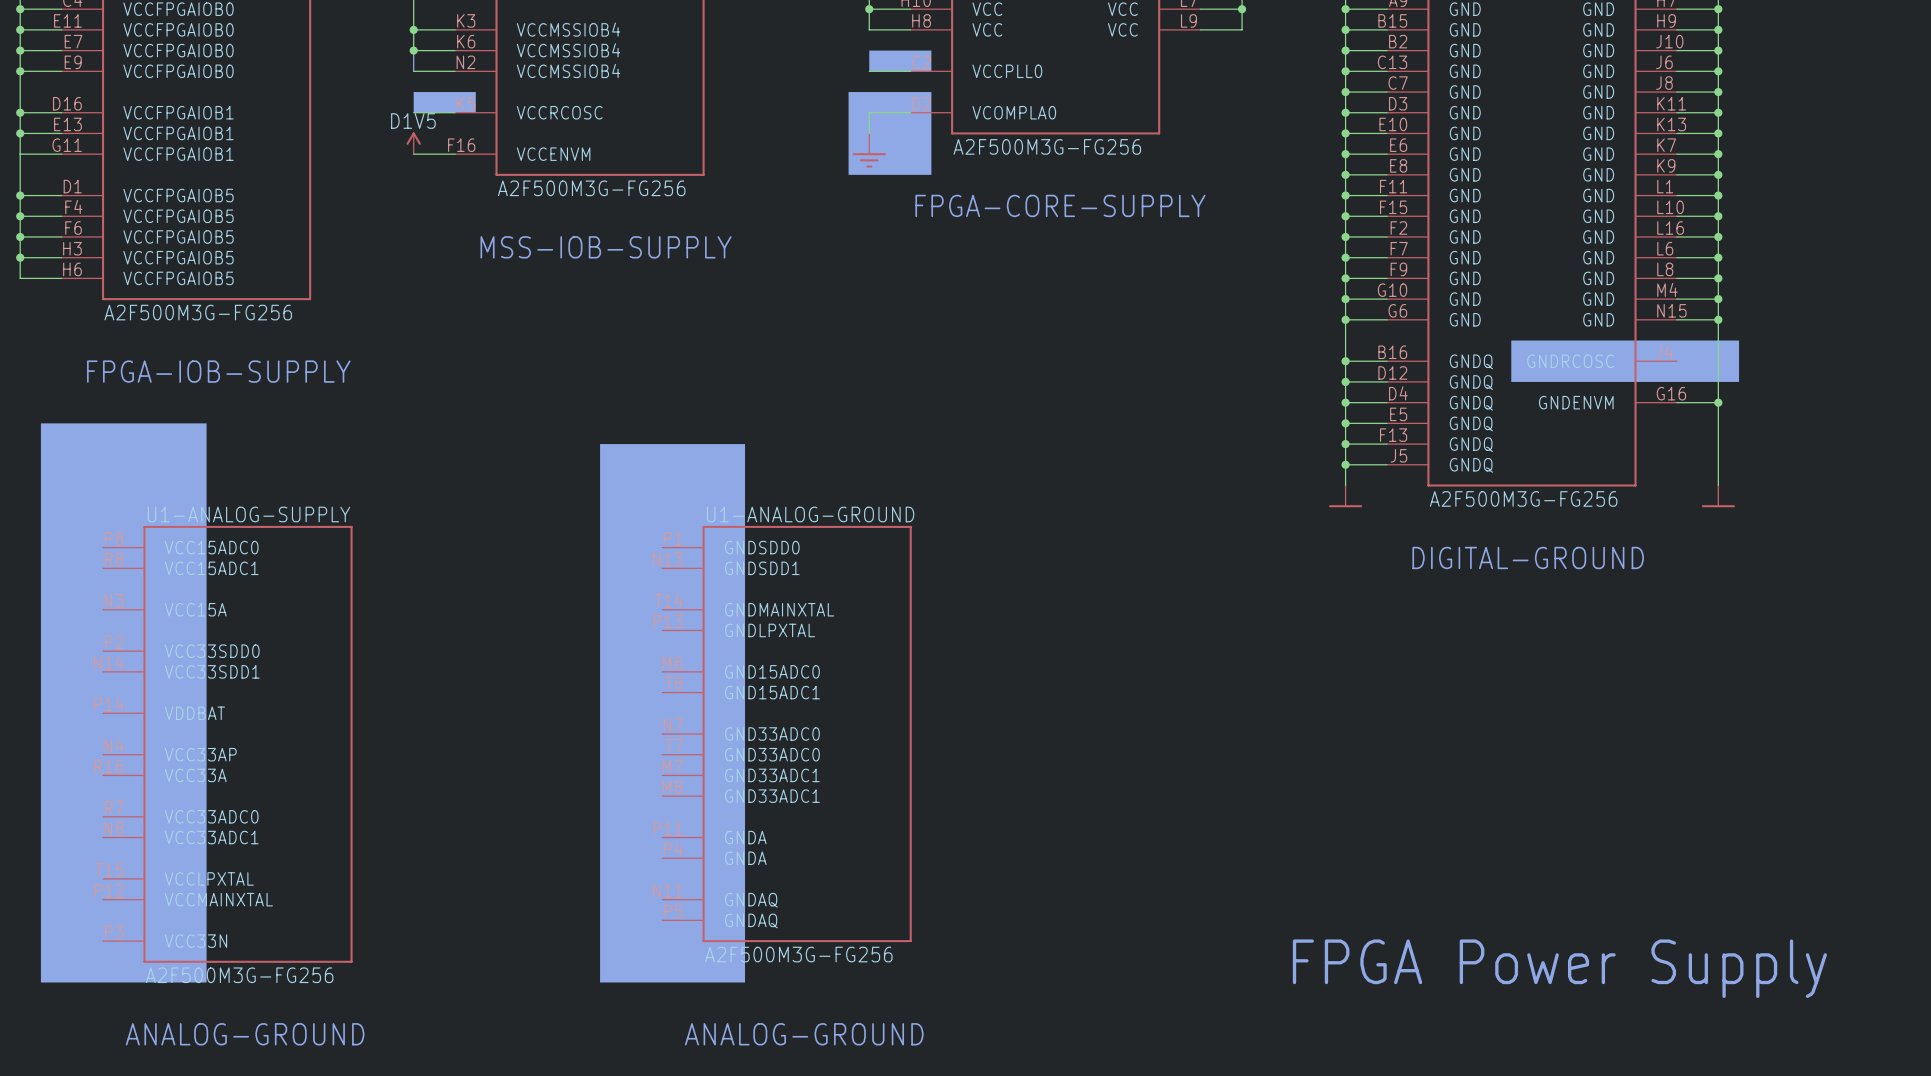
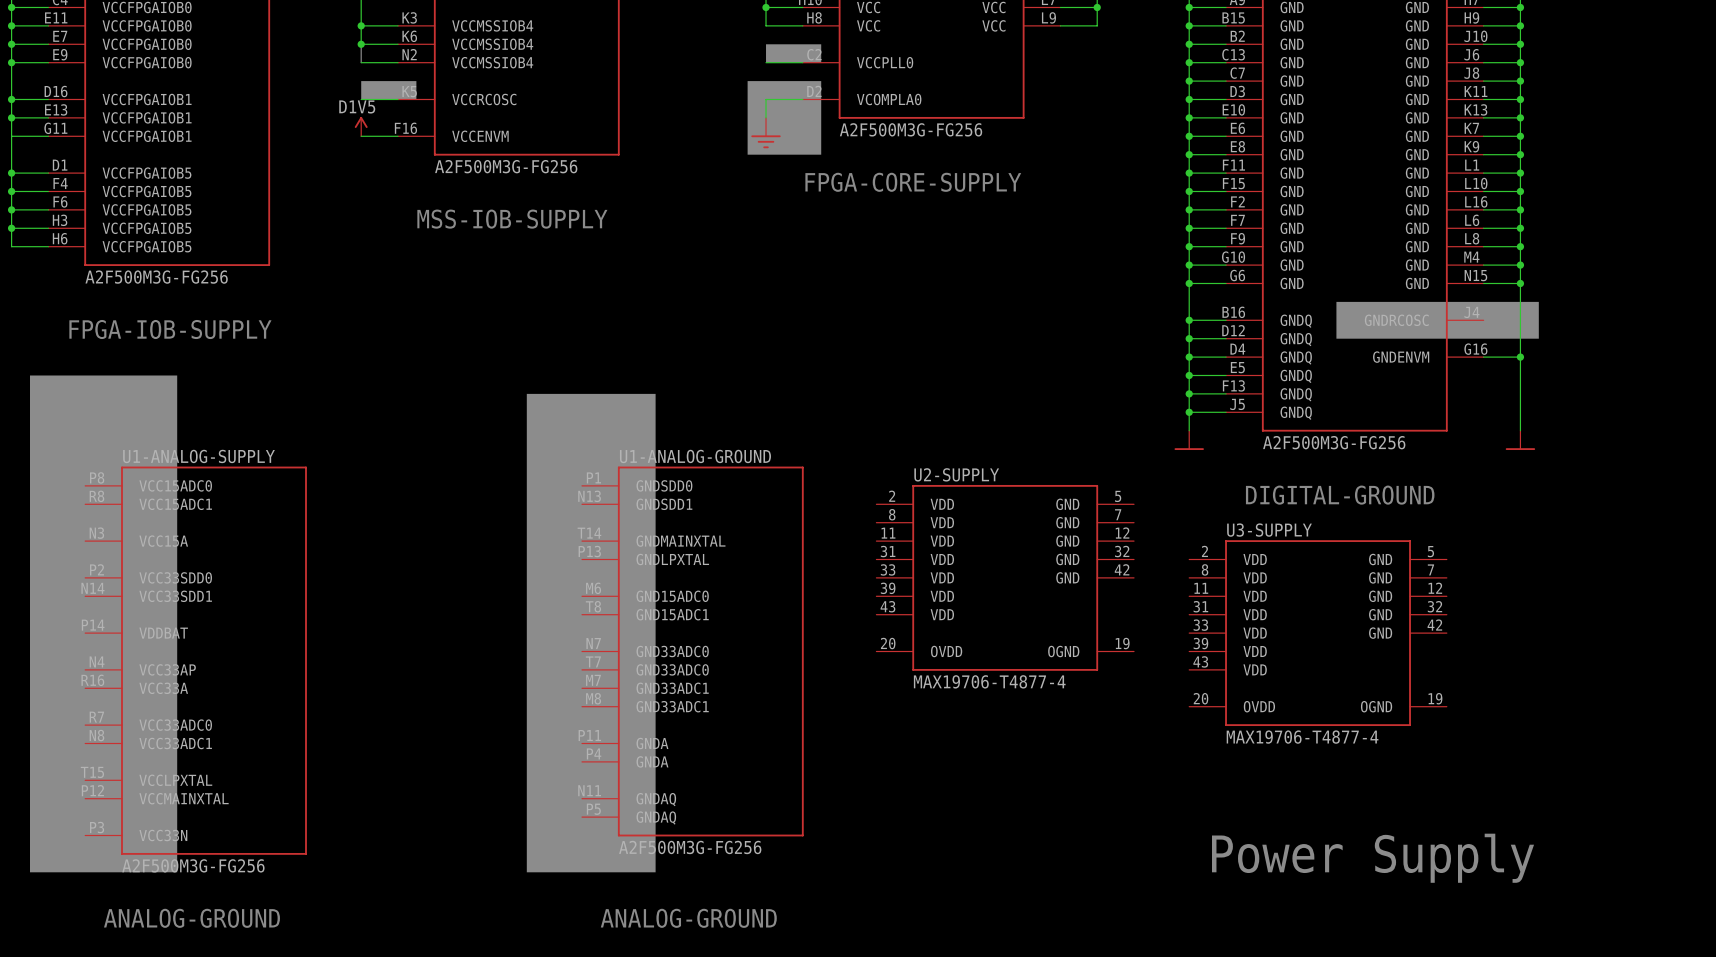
U2-SUPPLY: none -> MAX19706-T4877-4 (1005, 577)
U3-SUPPLY: none -> MAX19706-T4877-4 (1318, 633)
text: FPGA Power Supply (1559, 968) -> Power Supply (1373, 858)

